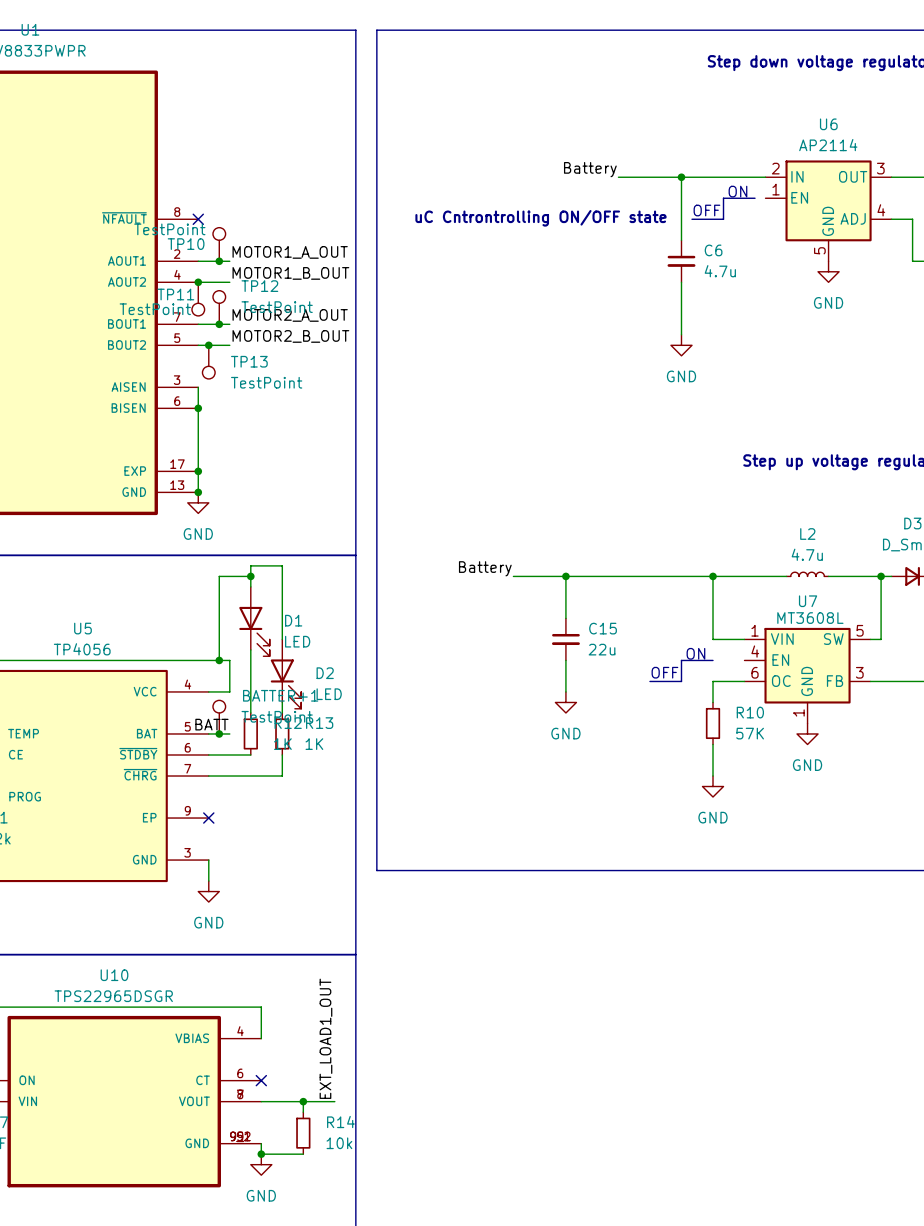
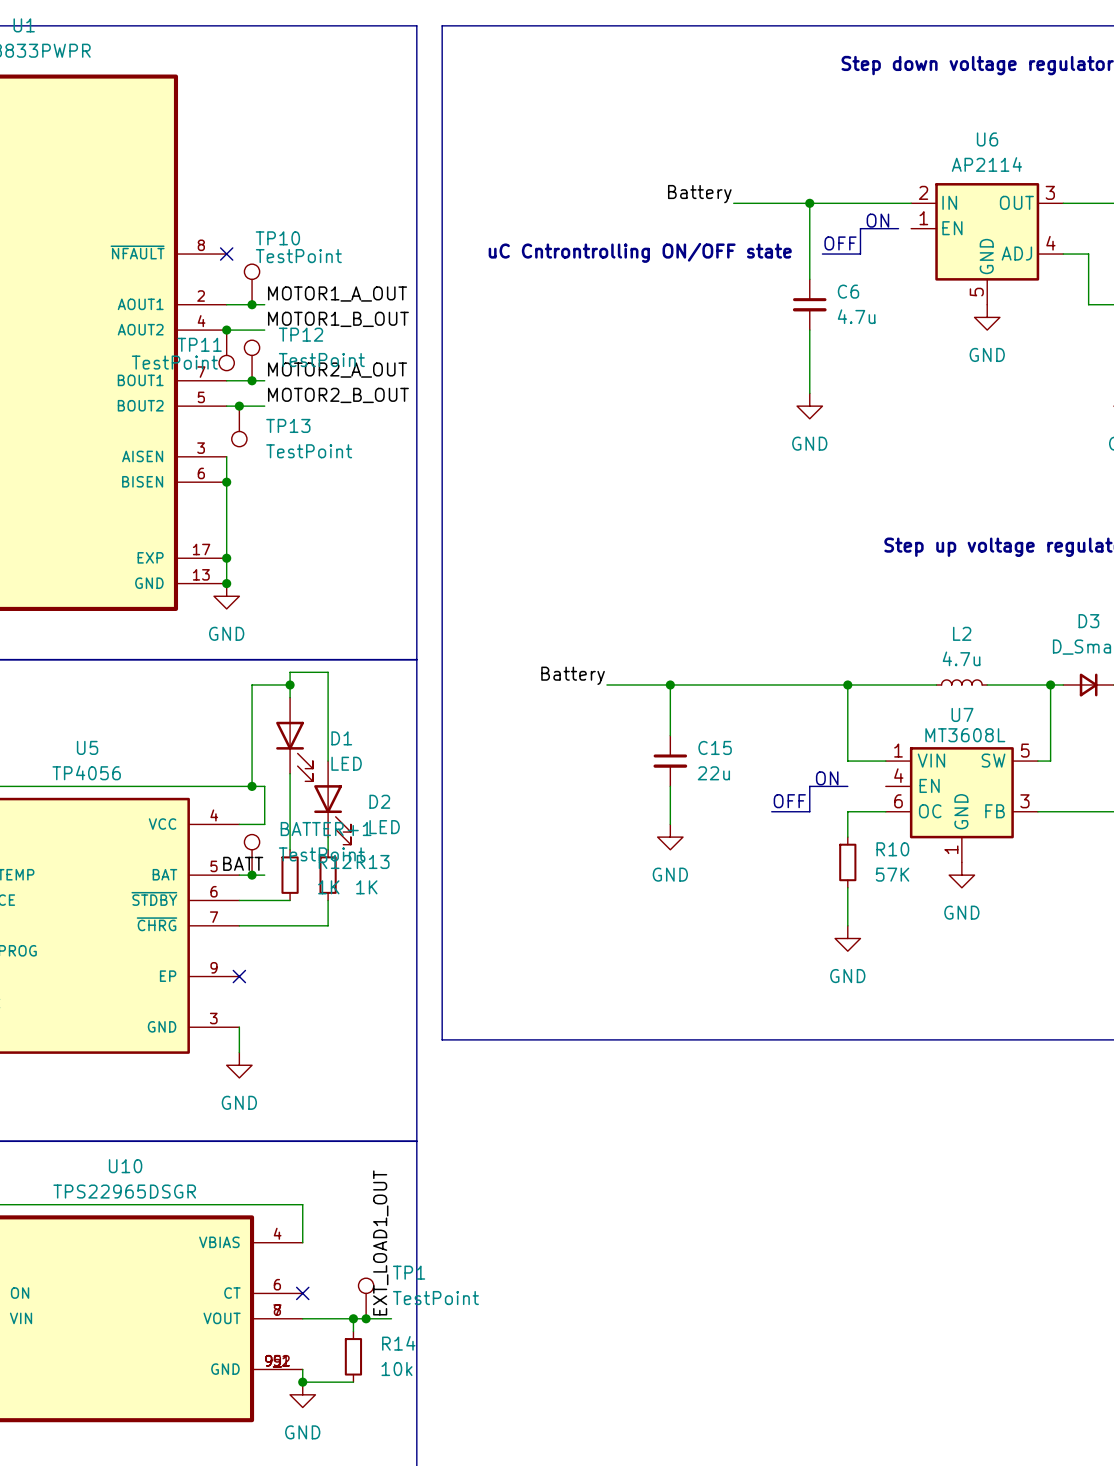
TP10 value position: TestPoint (169, 229) -> TestPoint (298, 256)
TP10 name position: TP10 (186, 244) -> TP10 (277, 238)
TP1: none -> TestPoint (366, 1298)
junction: none -> (366, 1318)

